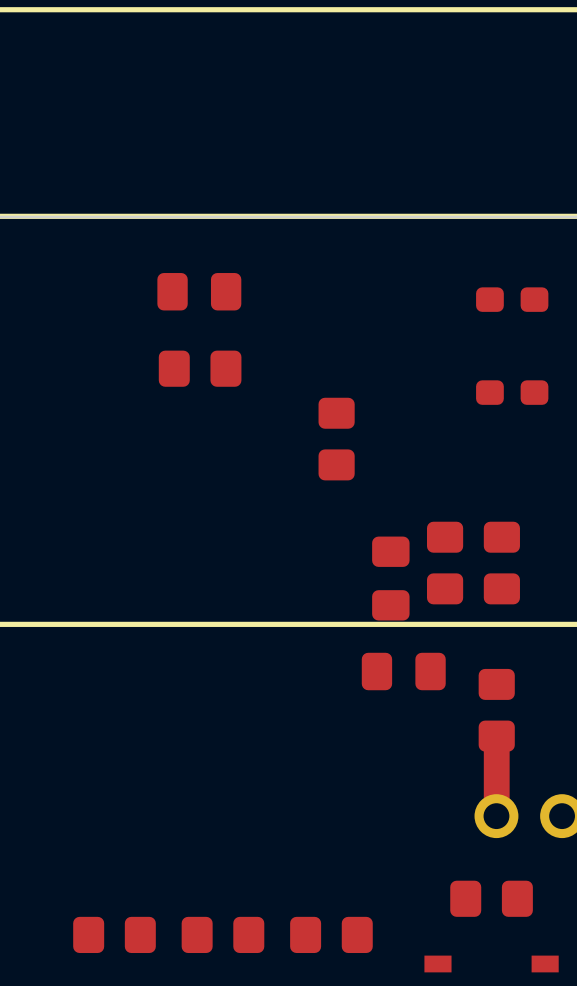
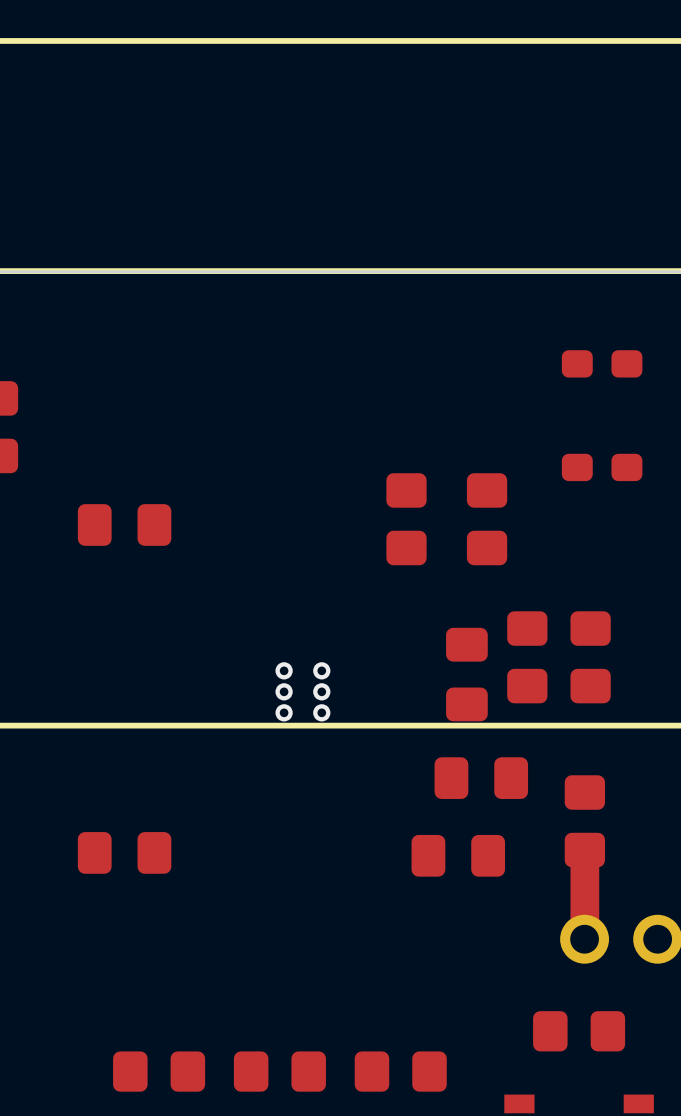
part position: (199, 291) -> (124, 524)
part rotation: 0° (200, 368) -> 90° clockwise (487, 519)
part position: (200, 368) -> (487, 519)
via: none -> (284, 670)
via: none -> (321, 670)
via: none -> (284, 691)
via: none -> (321, 691)
via: none -> (284, 712)
via: none -> (321, 712)
part: none -> (124, 852)
part: none -> (458, 855)

